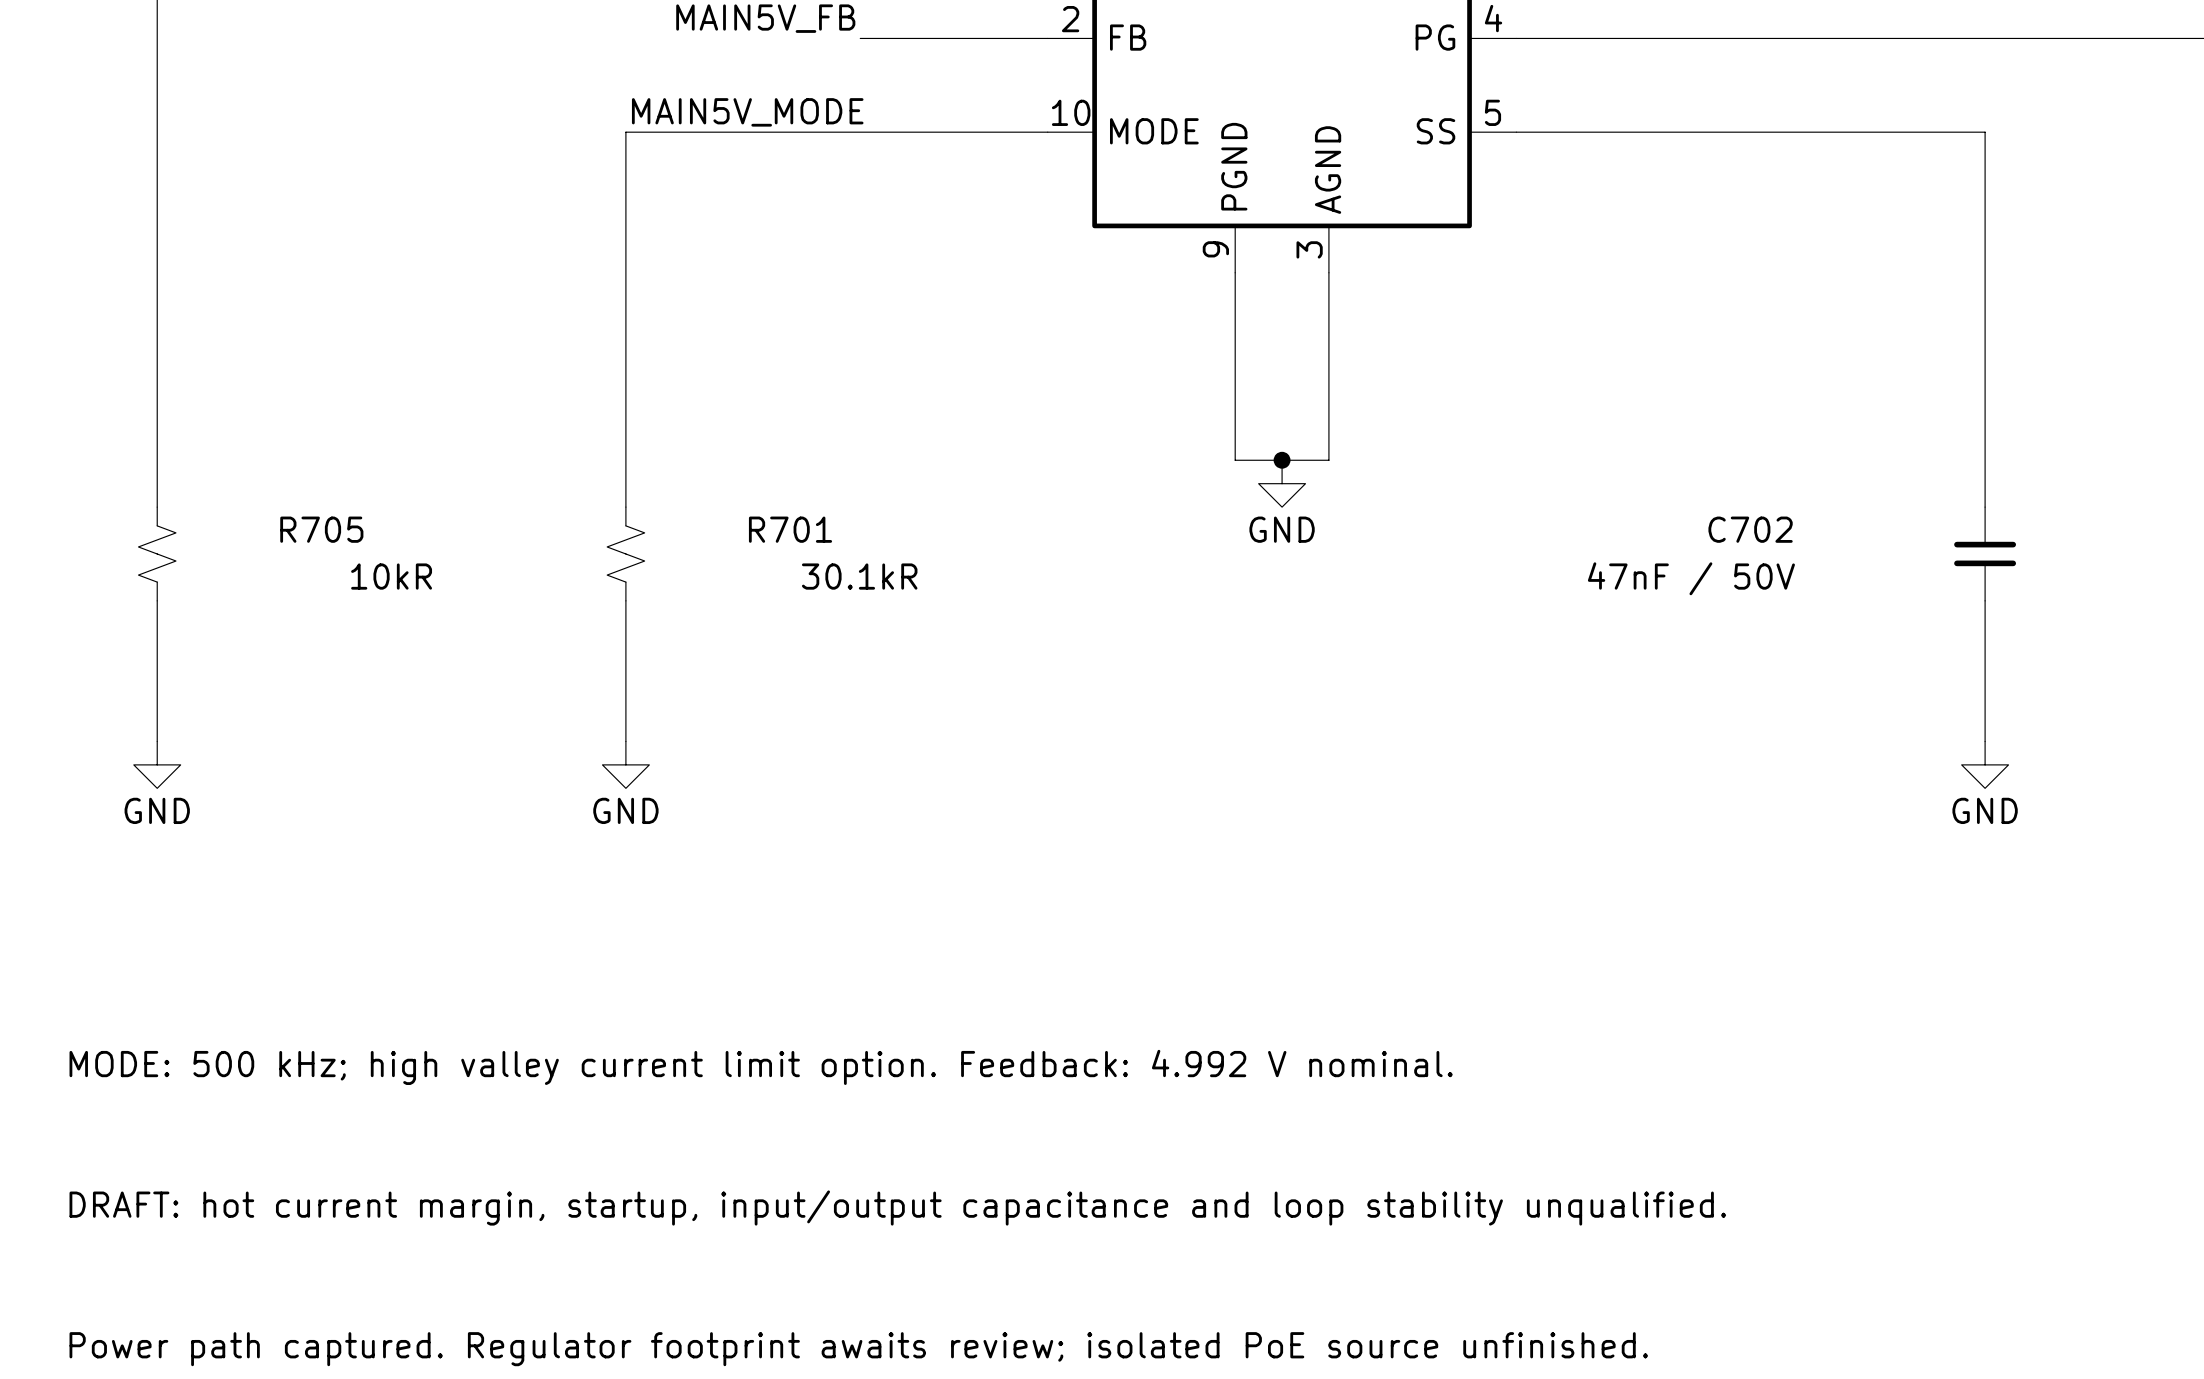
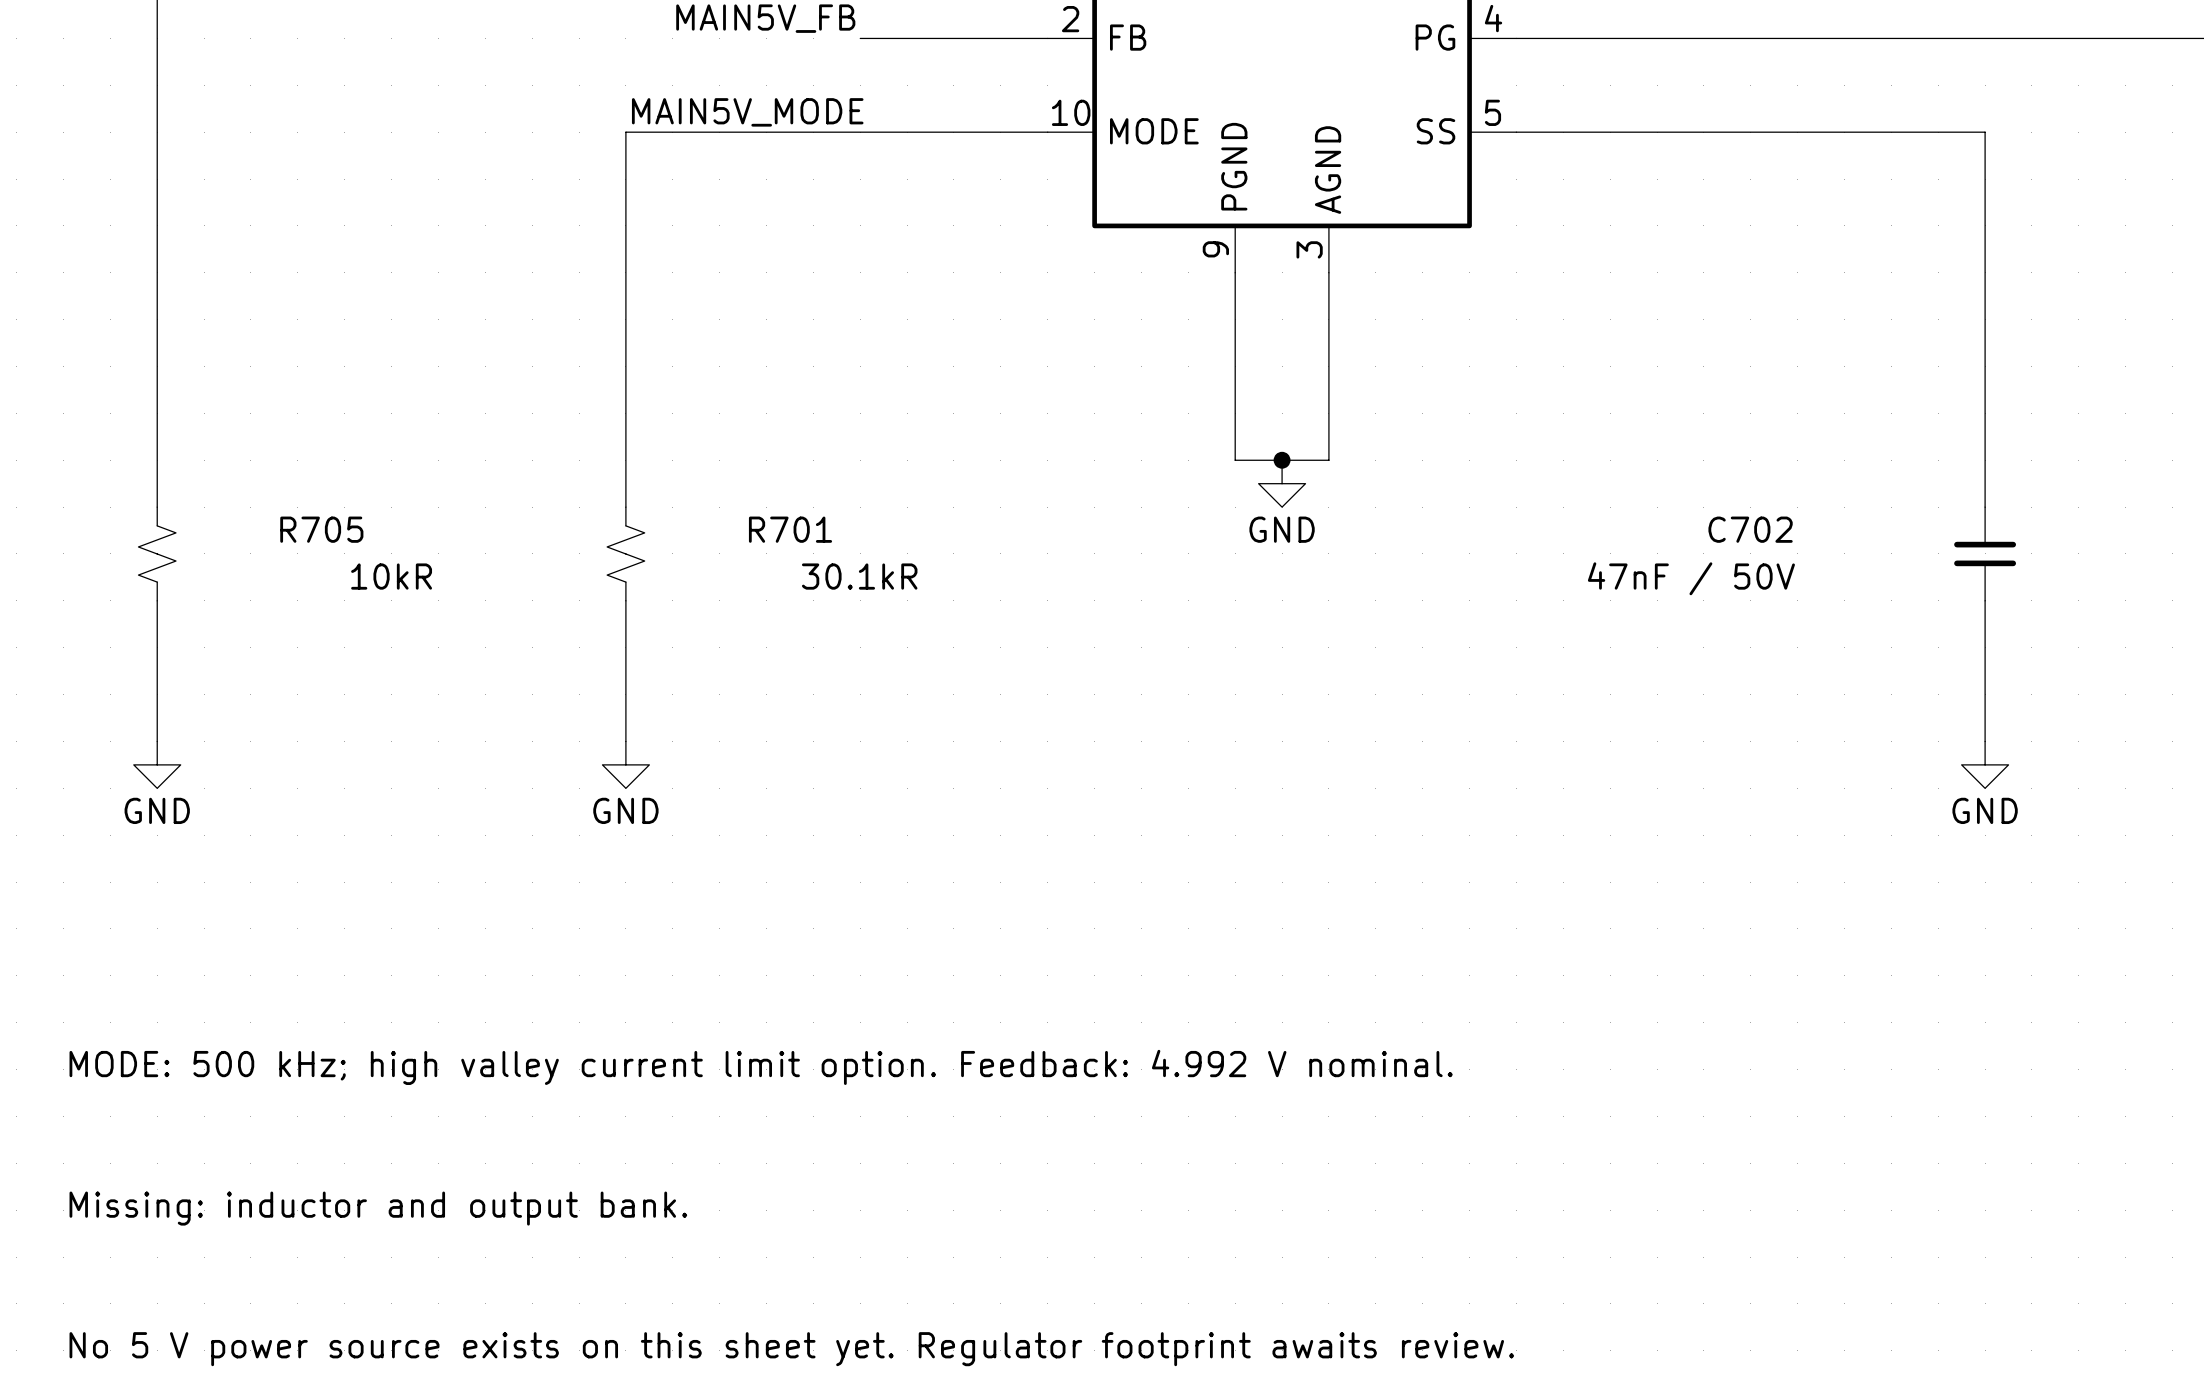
text: DRAFT: hot current margin, startup, input/output capacitance and loop stability unqualified. (897, 1208) -> Missing: inductor and output bank. (378, 1208)
text: Power path captured. Regulator footprint awaits review; isolated PoE source unfinished. (858, 1349) -> No 5 V power source exists on this sheet yet. Regulator footprint awaits review. (791, 1349)

